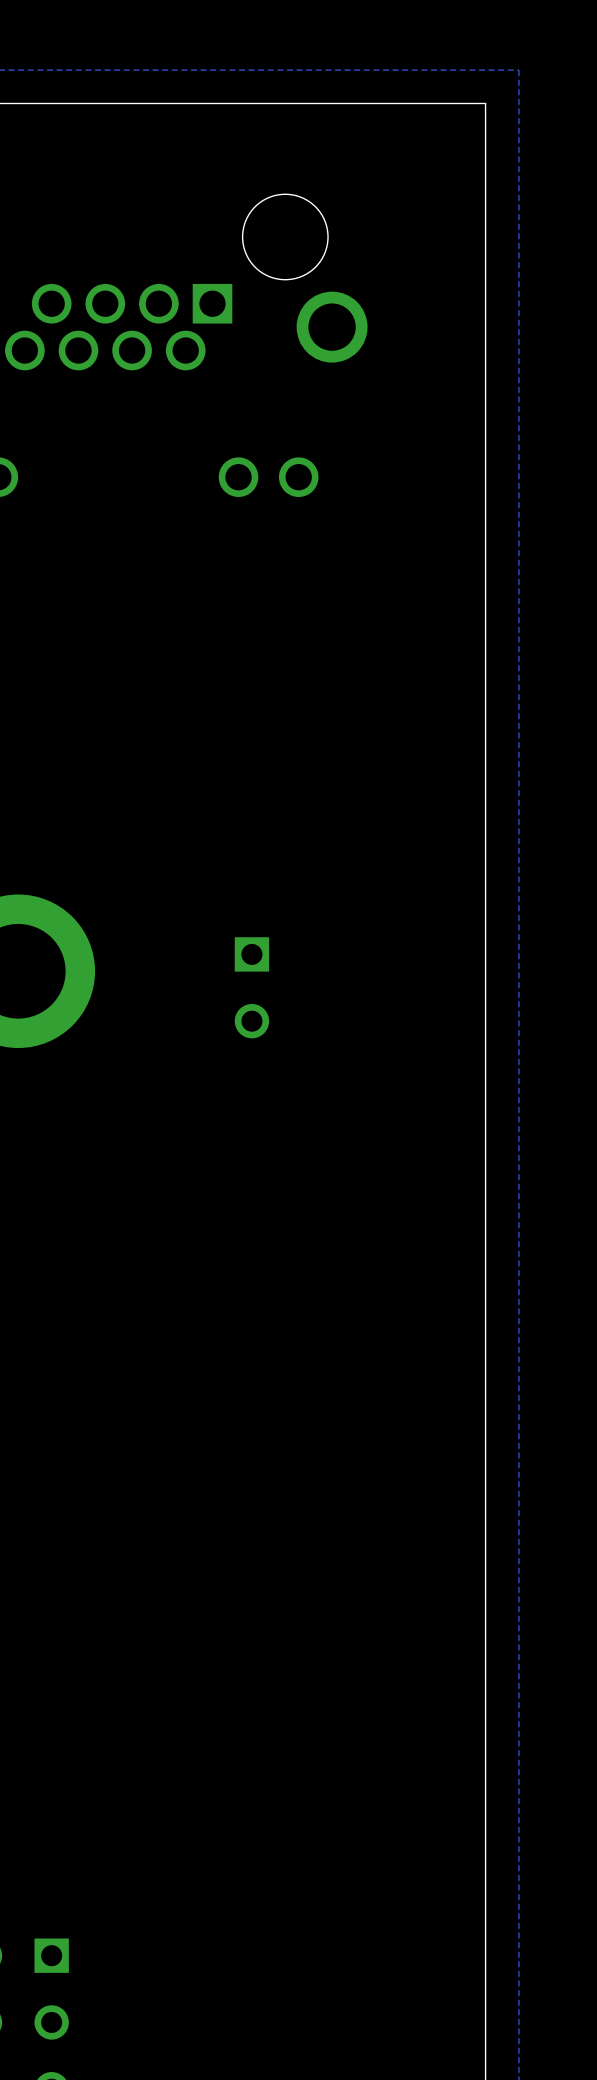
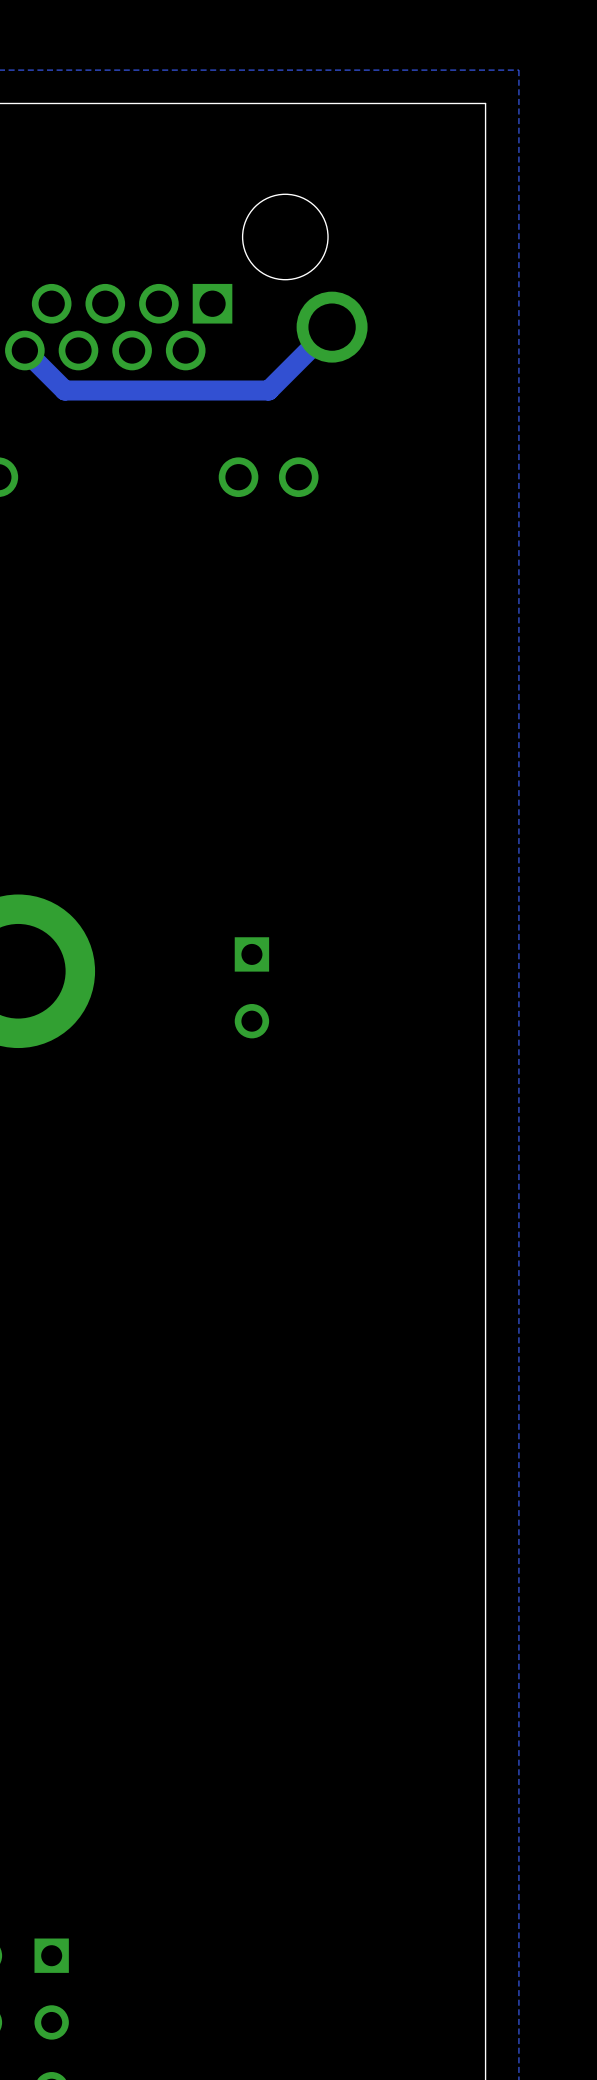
track: none -> (332, 327) (268, 390) (64, 390) (24, 350)

